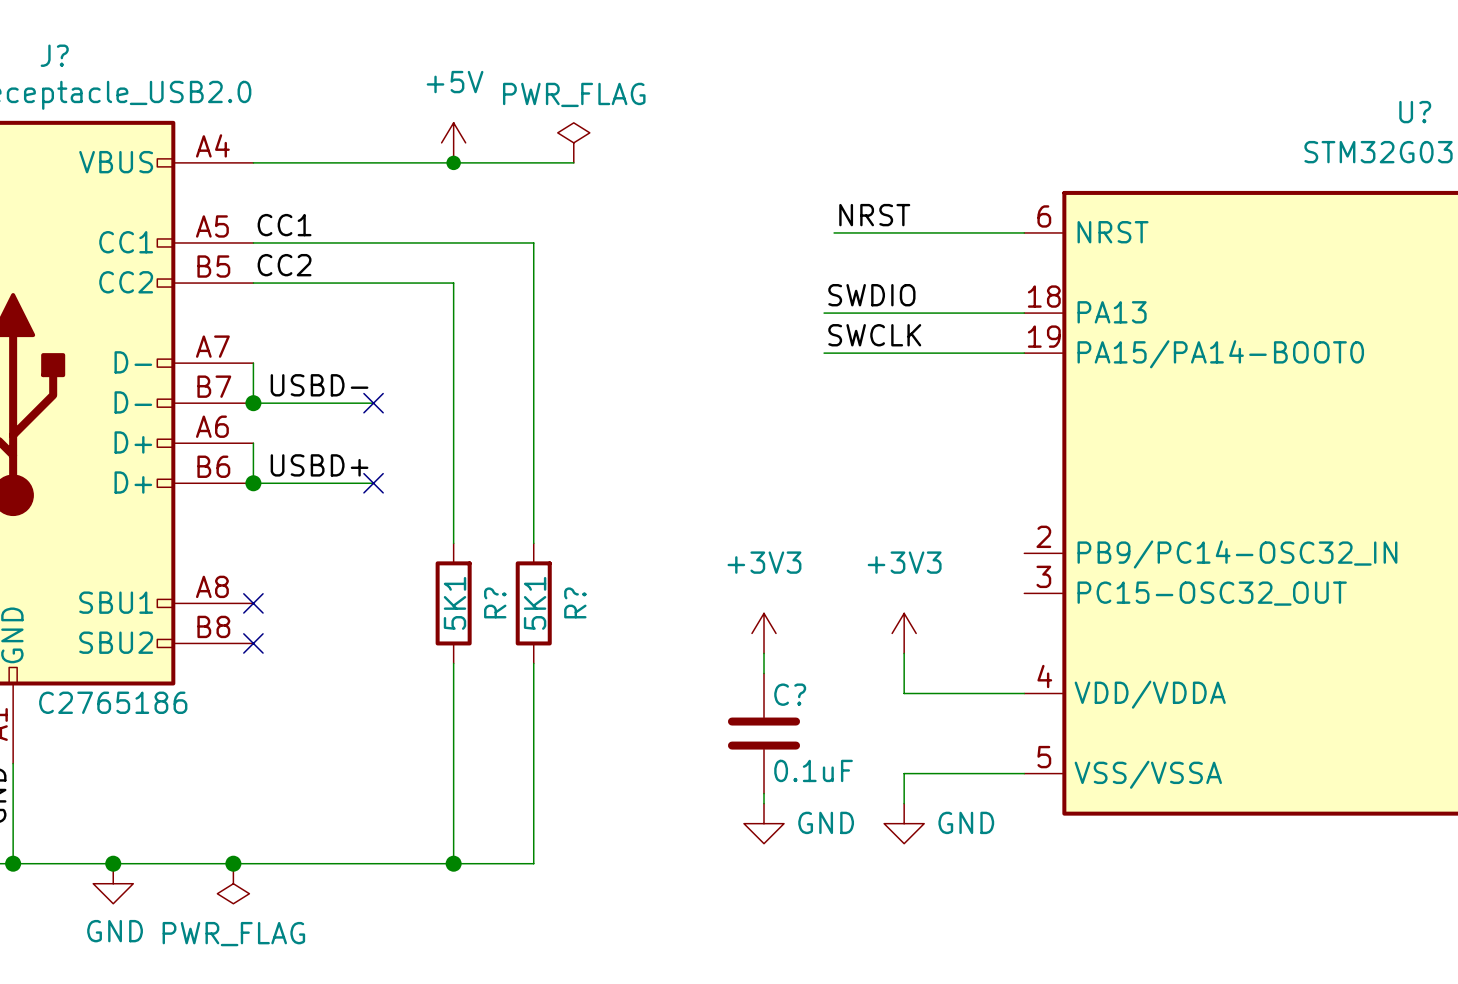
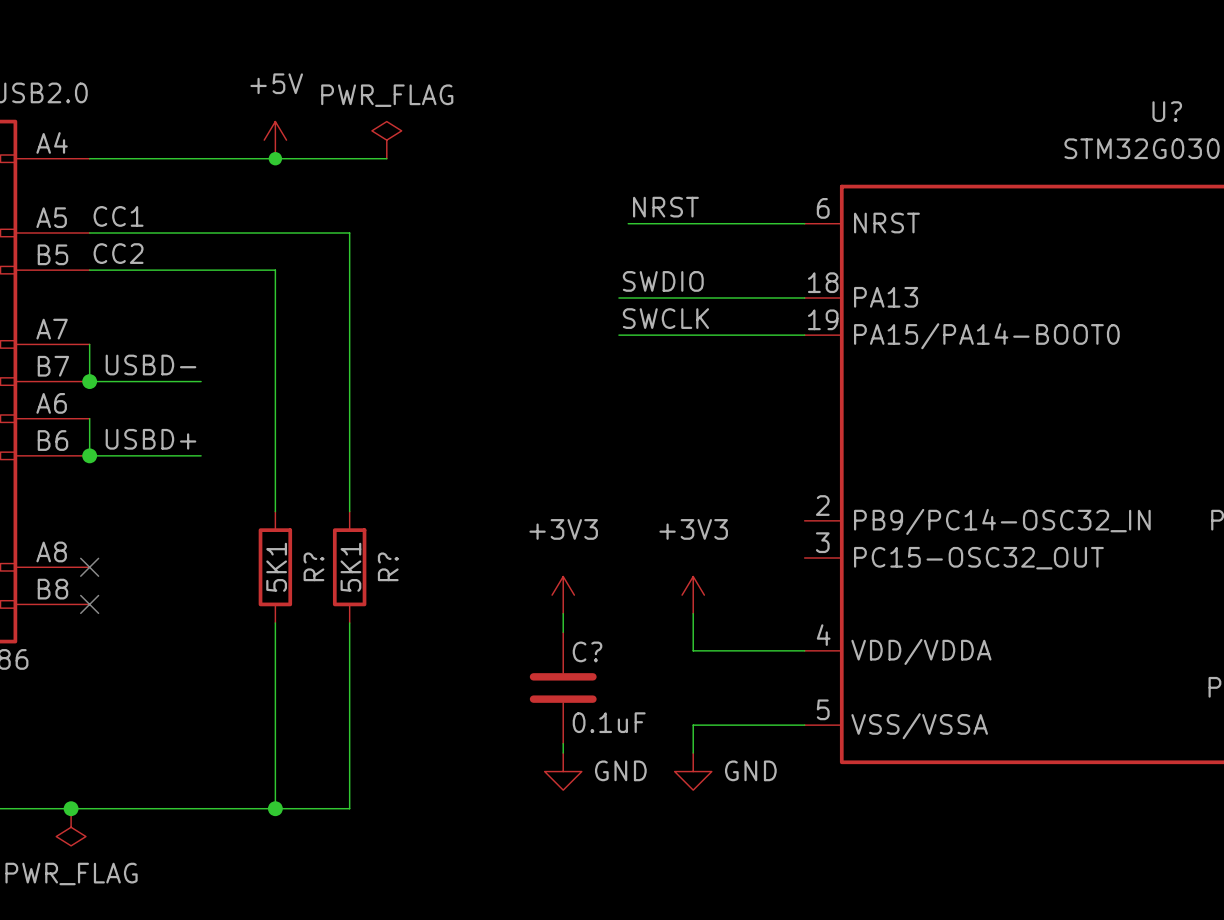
no-connect mark: (373, 403) -> none
no-connect mark: (373, 483) -> none

